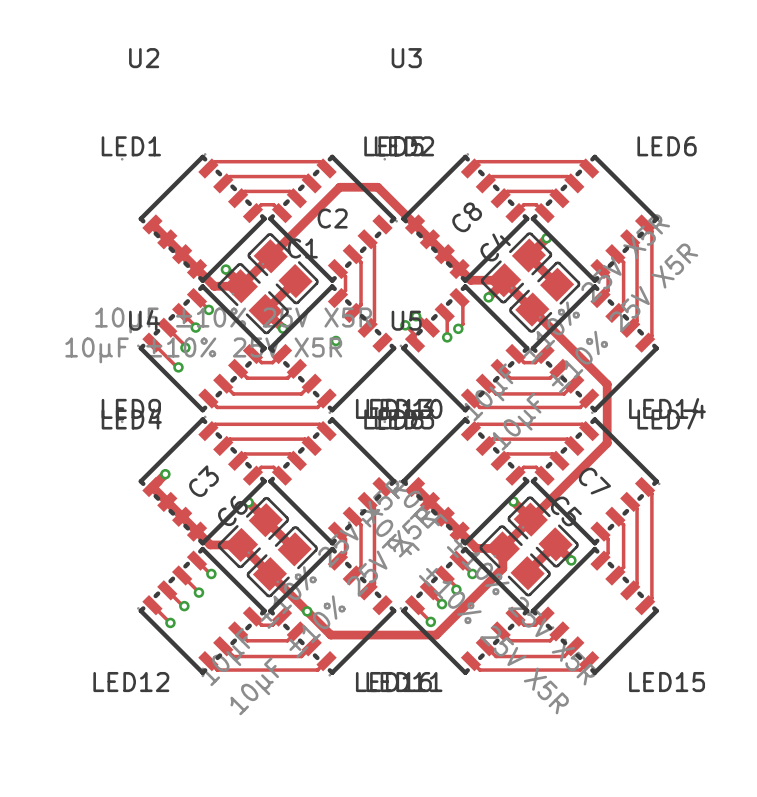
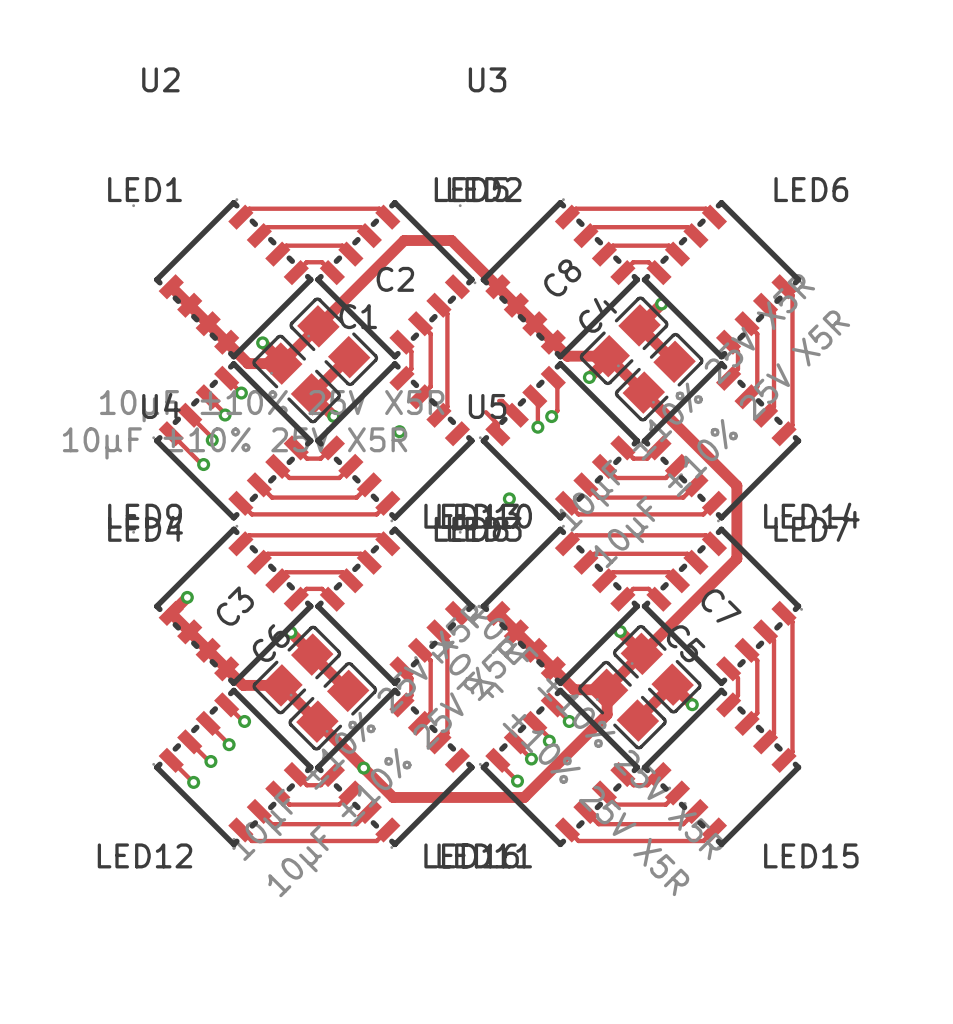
via: (416, 316) -> none
via: (405, 325) -> none
via: none -> (509, 498)

